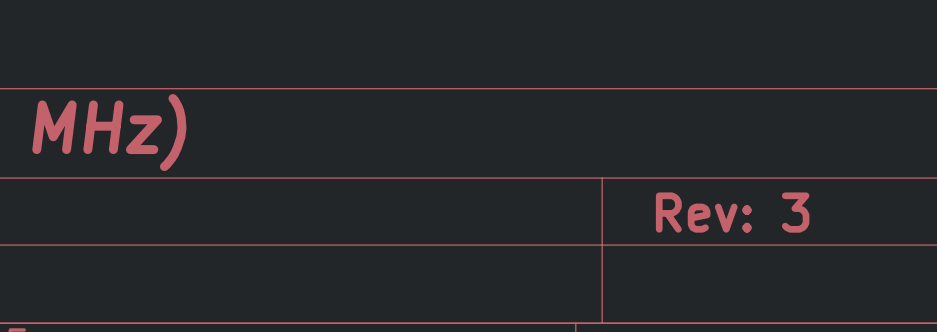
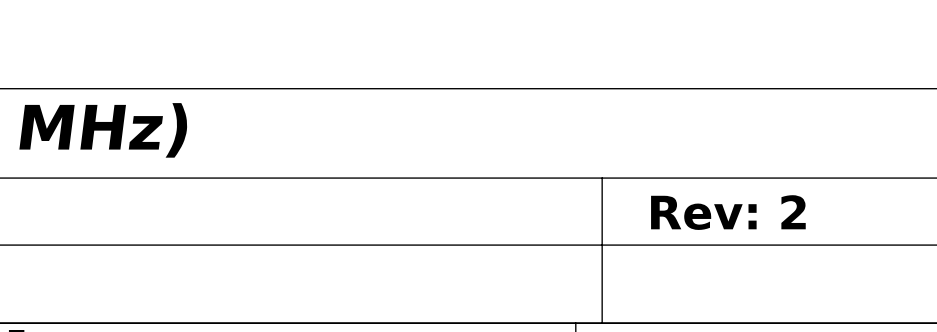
title block: Rev: 3 (732, 212) -> Rev: 2 (728, 212)

